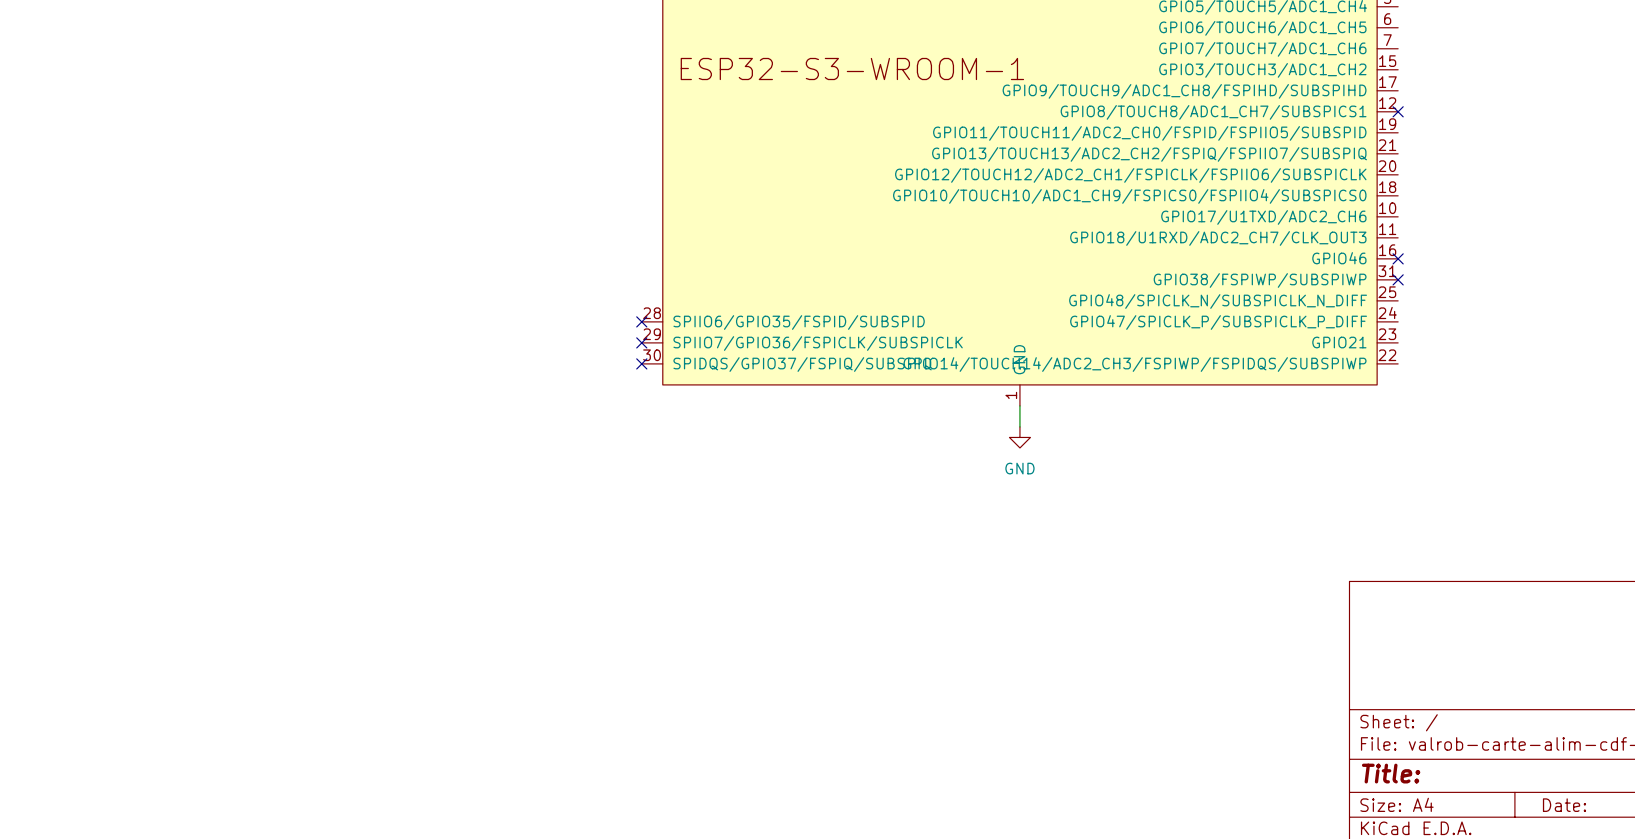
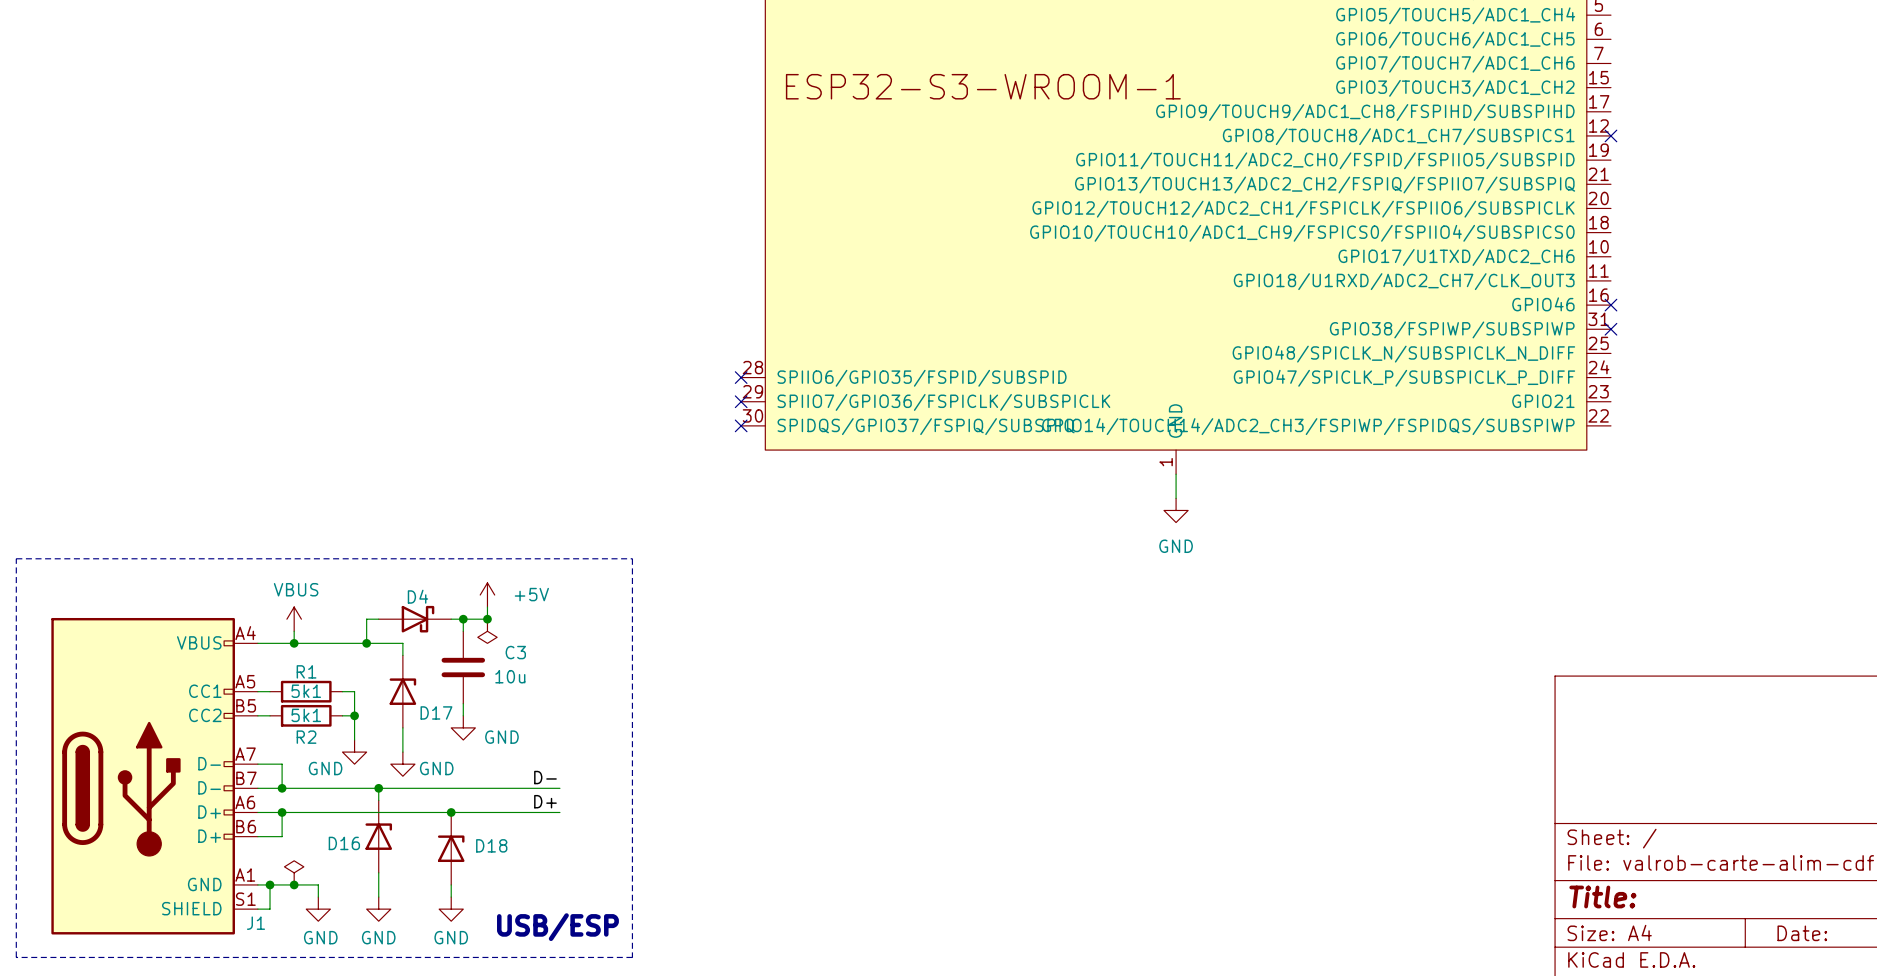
line: none -> (16, 558) (632, 558) (632, 957) (16, 957) (16, 558)
power symbol: none -> +5V (487, 595)
wire: none -> (487, 607) (487, 619) (451, 619)
power symbol: none -> VBUS (294, 619)
wire: none -> (378, 619) (366, 619) (366, 643)
D4: none -> (414, 619)
wire: none -> (463, 619) (463, 631)
junction: none -> (463, 619)
junction: none -> (487, 619)
wire: none -> (294, 631) (294, 643)
power symbol: none -> (487, 631)
wire: none -> (257, 643) (402, 643) (402, 655)
junction: none -> (294, 643)
junction: none -> (366, 643)
C3: none -> 10u (463, 667)
wire: none -> (257, 691) (270, 691)
R1: none -> 5k1 (306, 691)
wire: none -> (342, 691) (354, 691) (354, 739)
D17: none -> (402, 691)
wire: none -> (463, 703) (463, 715)
wire: none -> (257, 715) (270, 715)
R2: none -> 5k1 (306, 715)
wire: none -> (342, 715) (354, 715)
junction: none -> (354, 715)
wire: none -> (402, 727) (402, 752)
power symbol: none -> GND (463, 727)
power symbol: none -> GND (354, 752)
wire: none -> (257, 764) (282, 764) (282, 788)
power symbol: none -> GND (402, 764)
J1: none -> (154, 776)
label: none -> D- (545, 777)
wire: none -> (257, 788) (559, 788)
junction: none -> (282, 788)
wire: none -> (378, 788) (378, 800)
junction: none -> (378, 788)
label: none -> D+ (545, 801)
wire: none -> (257, 812) (559, 812)
wire: none -> (282, 812) (282, 836) (257, 836)
junction: none -> (282, 812)
junction: none -> (451, 812)
D16: none -> (378, 836)
D18: none -> (451, 848)
power symbol: none -> (294, 872)
wire: none -> (378, 872) (378, 897)
wire: none -> (257, 884) (318, 884) (318, 897)
wire: none -> (270, 884) (270, 909) (257, 909)
junction: none -> (270, 884)
junction: none -> (294, 884)
wire: none -> (451, 884) (451, 897)
power symbol: none -> GND (318, 909)
power symbol: none -> GND (378, 909)
power symbol: none -> GND (451, 909)
text: none -> USB/ESP (557, 927)

